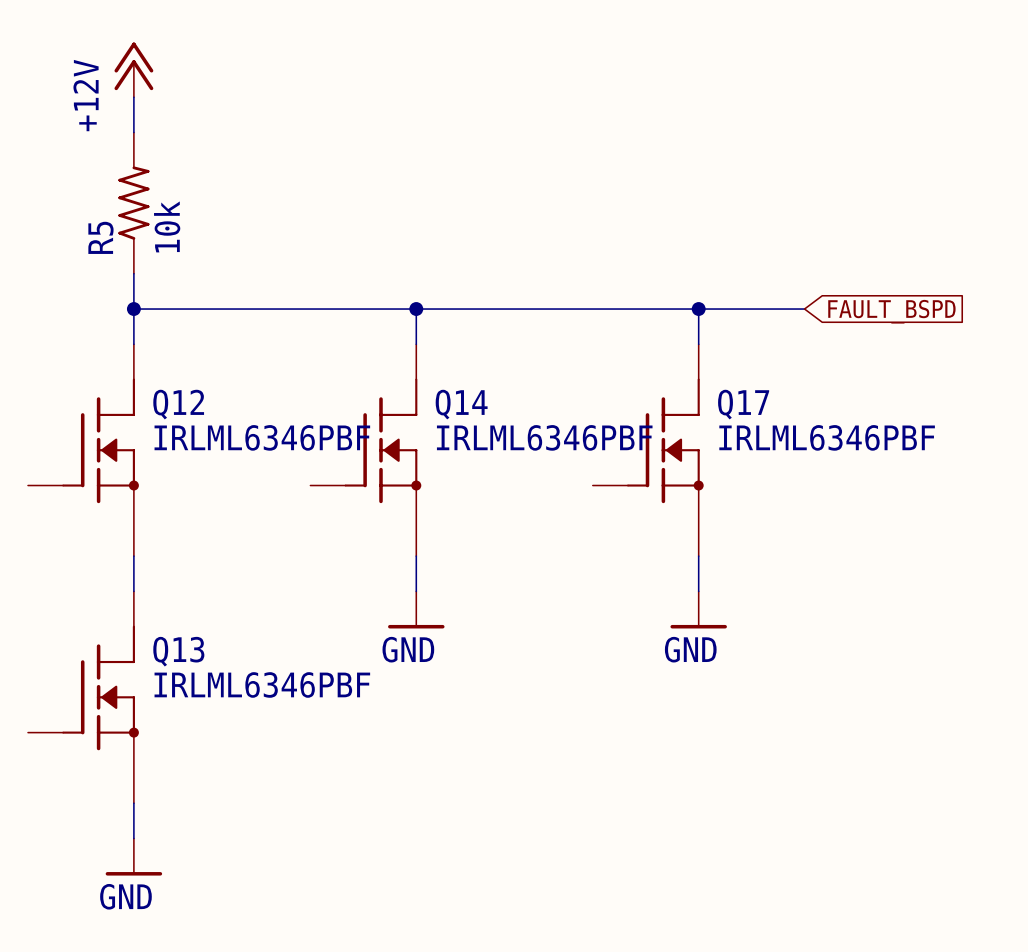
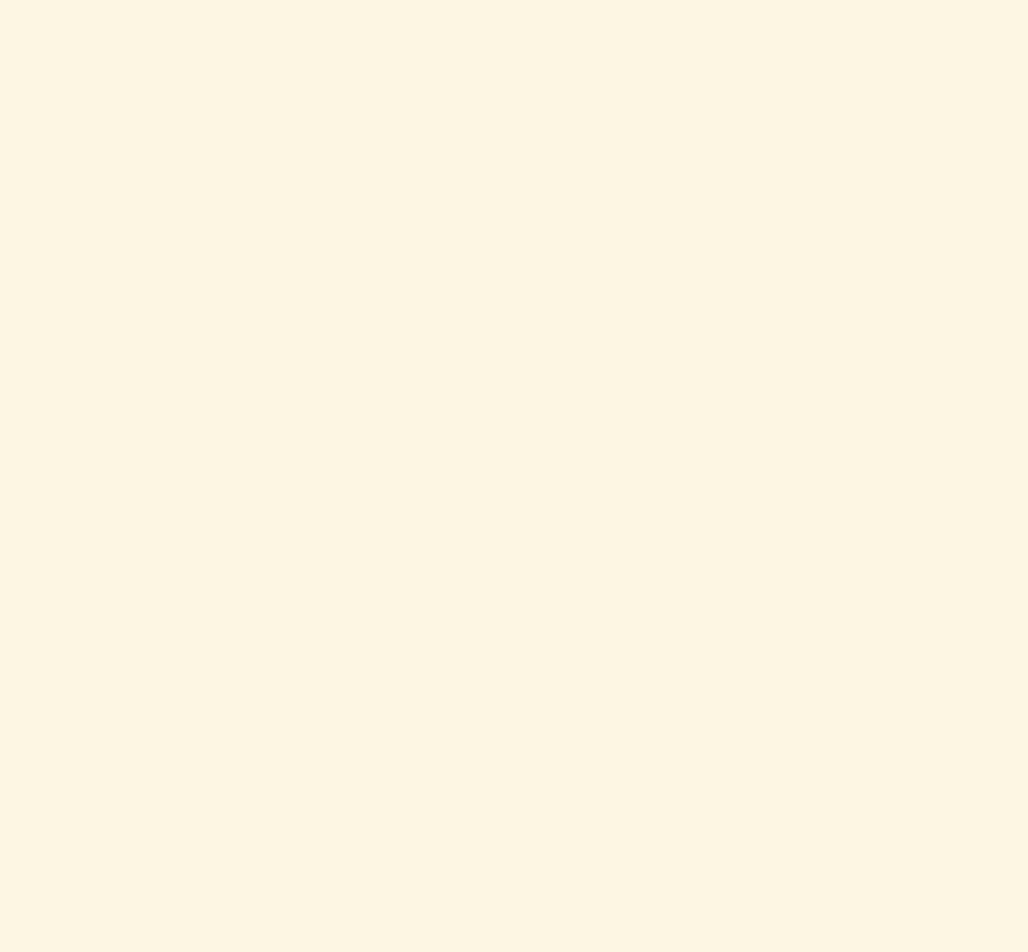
power symbol: +12V (133, 69) -> none
wire: (133, 97) (133, 132) -> none
R5: 10k (133, 203) -> none
wire: (133, 273) (133, 344) -> none
wire: (133, 309) (804, 309) -> none
junction: (133, 309) -> none
wire: (416, 309) (416, 344) -> none
junction: (416, 309) -> none
wire: (698, 309) (698, 344) -> none
junction: (698, 309) -> none
global label: FAULT_BSPD (891, 311) -> none
Q12: IRLML6346PBF (83, 450) -> none
Q14: IRLML6346PBF (365, 450) -> none
Q17: IRLML6346PBF (648, 450) -> none
wire: (133, 556) (133, 591) -> none
wire: (416, 556) (416, 591) -> none
wire: (698, 556) (698, 591) -> none
power symbol: GND (416, 609) -> none
power symbol: GND (698, 609) -> none
Q13: IRLML6346PBF (83, 697) -> none
wire: (133, 803) (133, 838) -> none
power symbol: GND (133, 857) -> none

